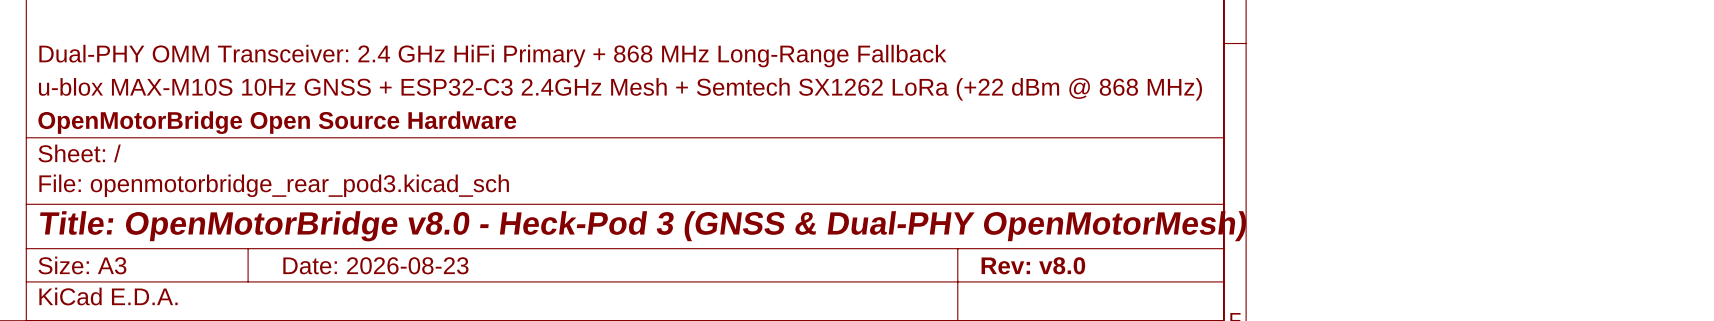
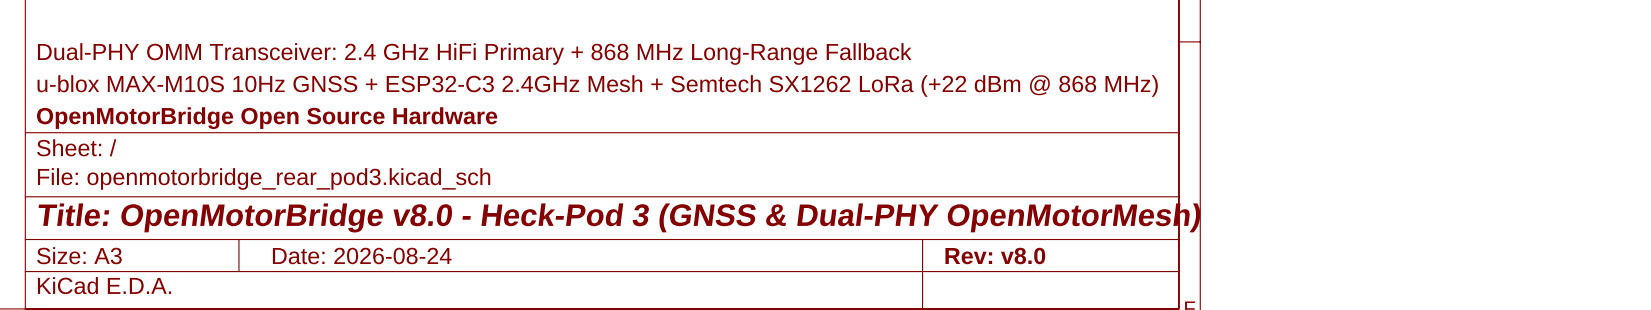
title block: Date: 2026-08-23 (375, 265) -> Date: 2026-08-24 (362, 256)

